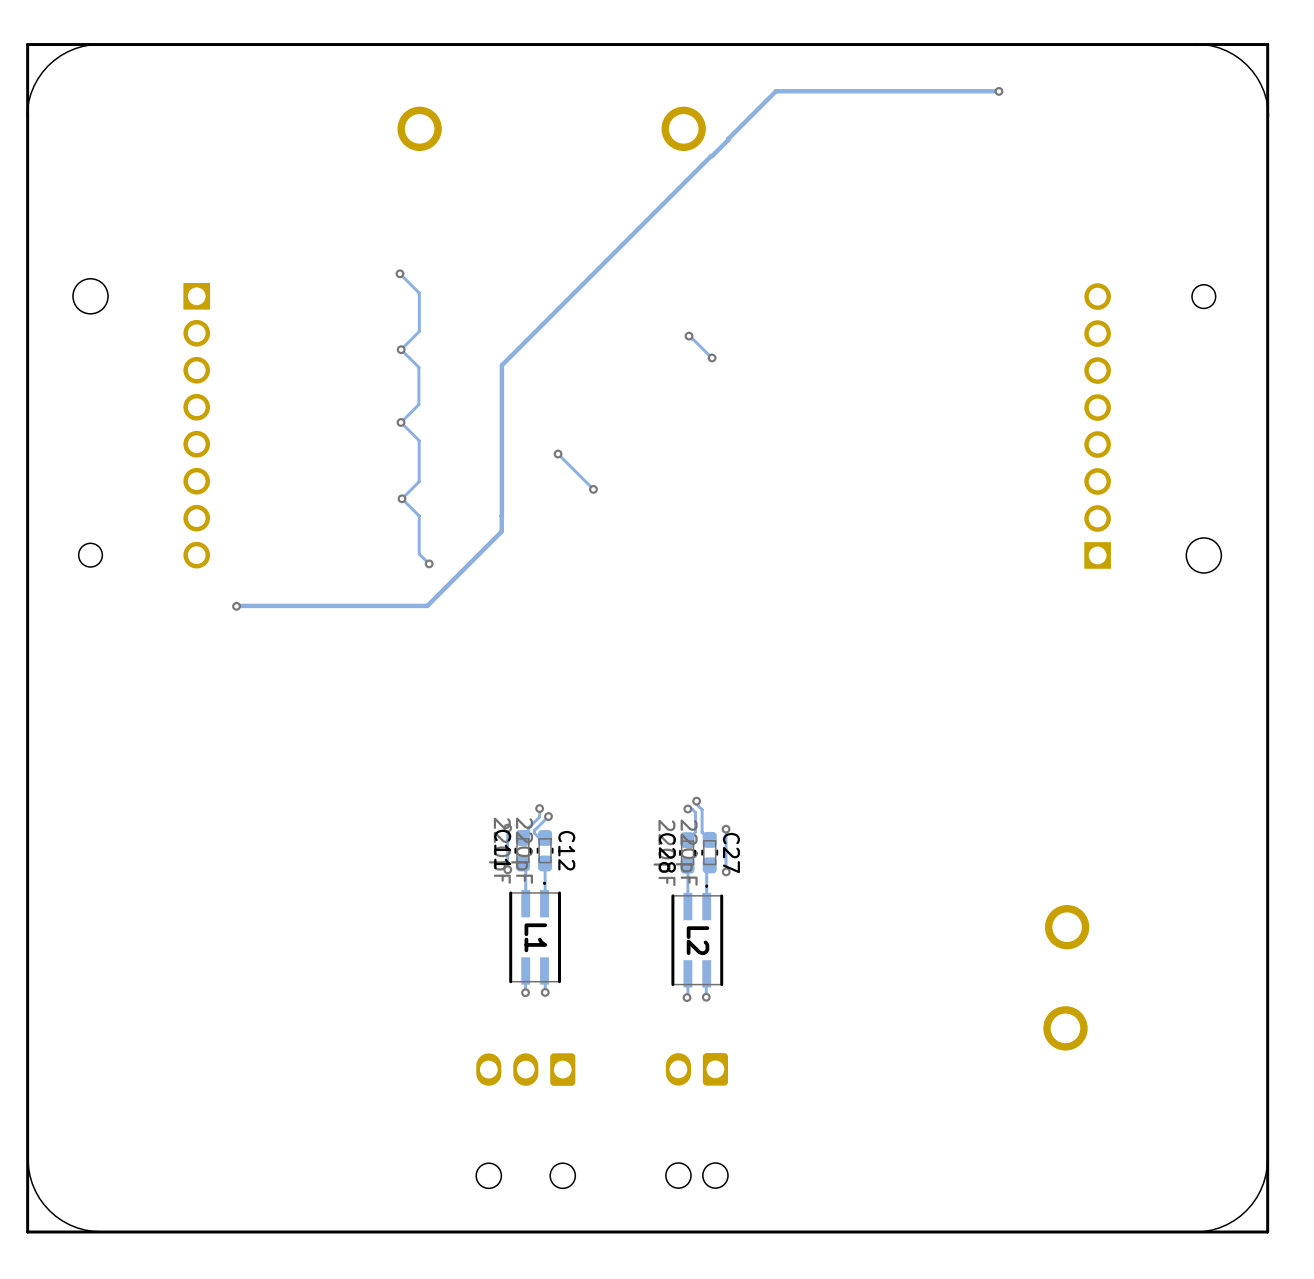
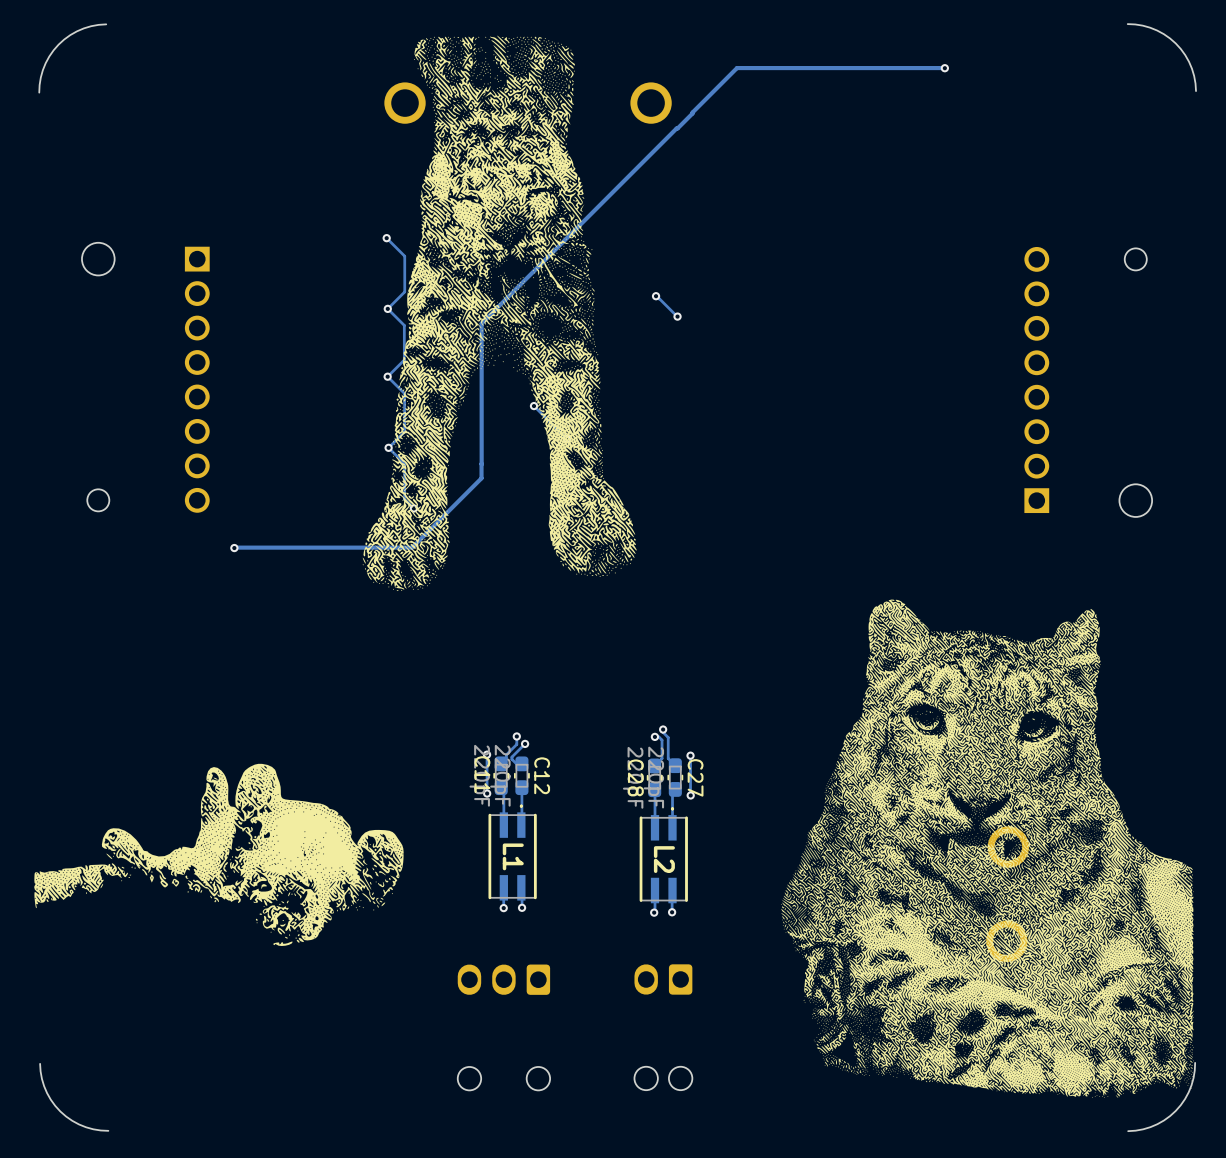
board edge: (1267, 44) (27, 44) (27, 1231) (1267, 1231) (1267, 44) -> none
drawing: none -> [362, 35, 637, 592]
drawing: none -> [780, 599, 1194, 1098]
drawing: none -> [34, 763, 404, 947]

